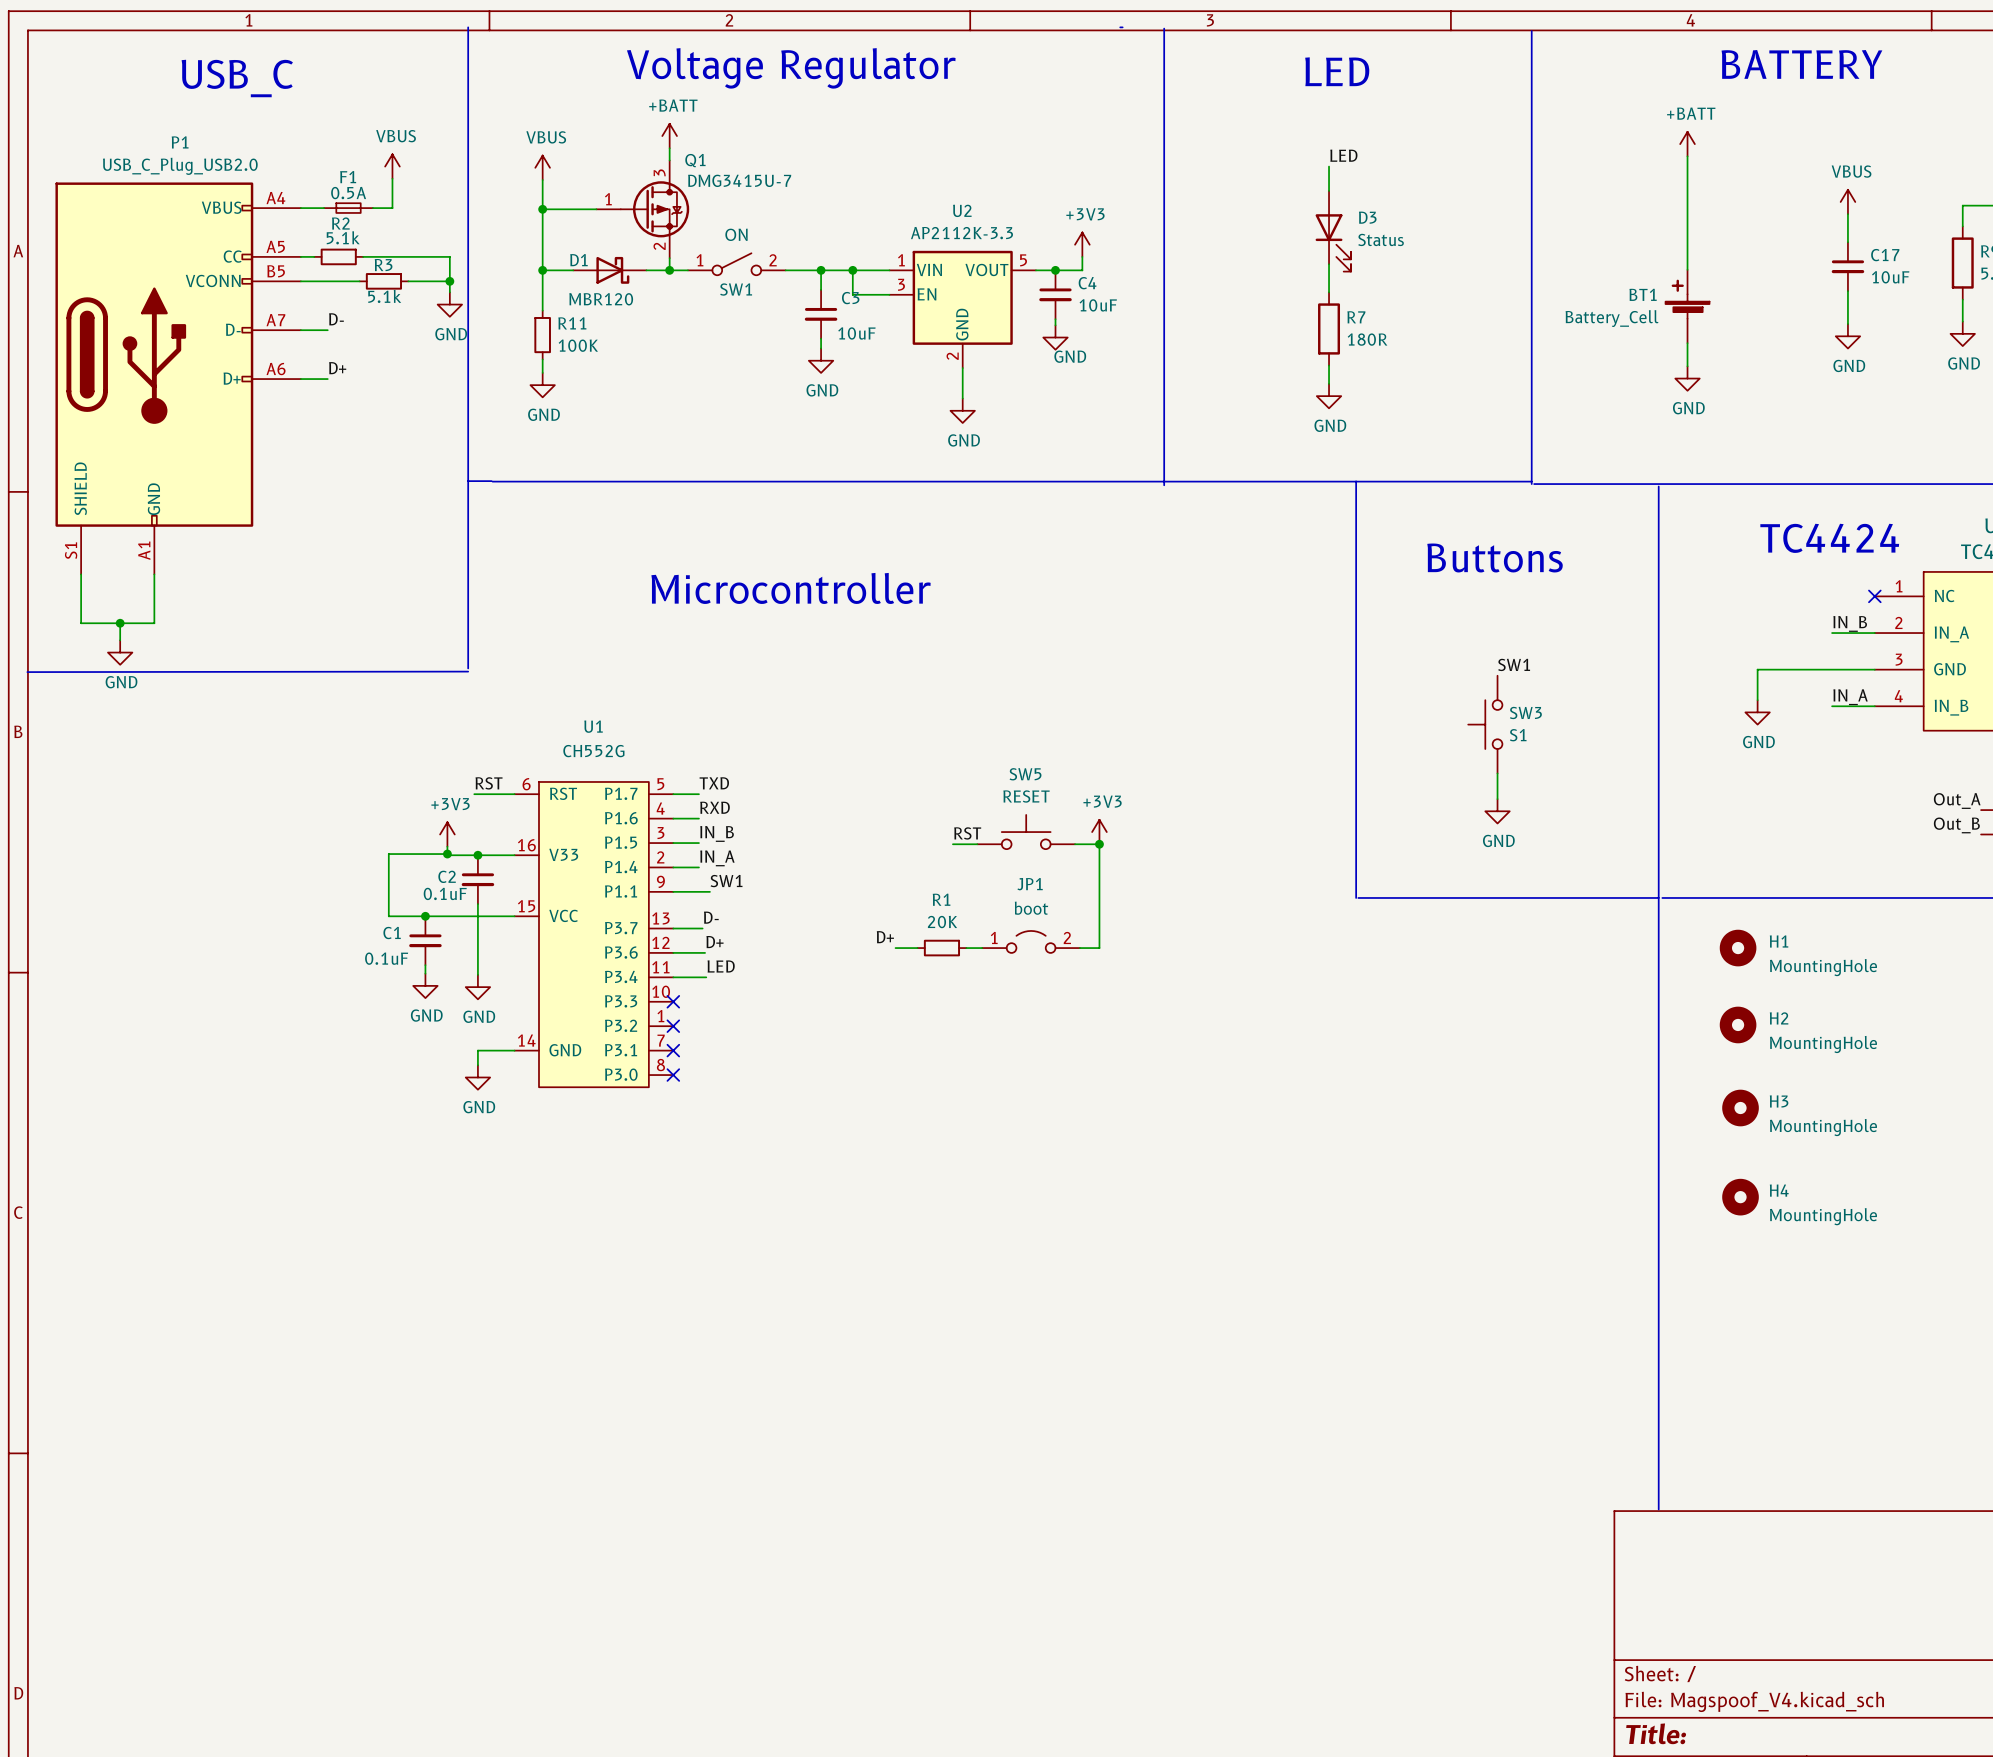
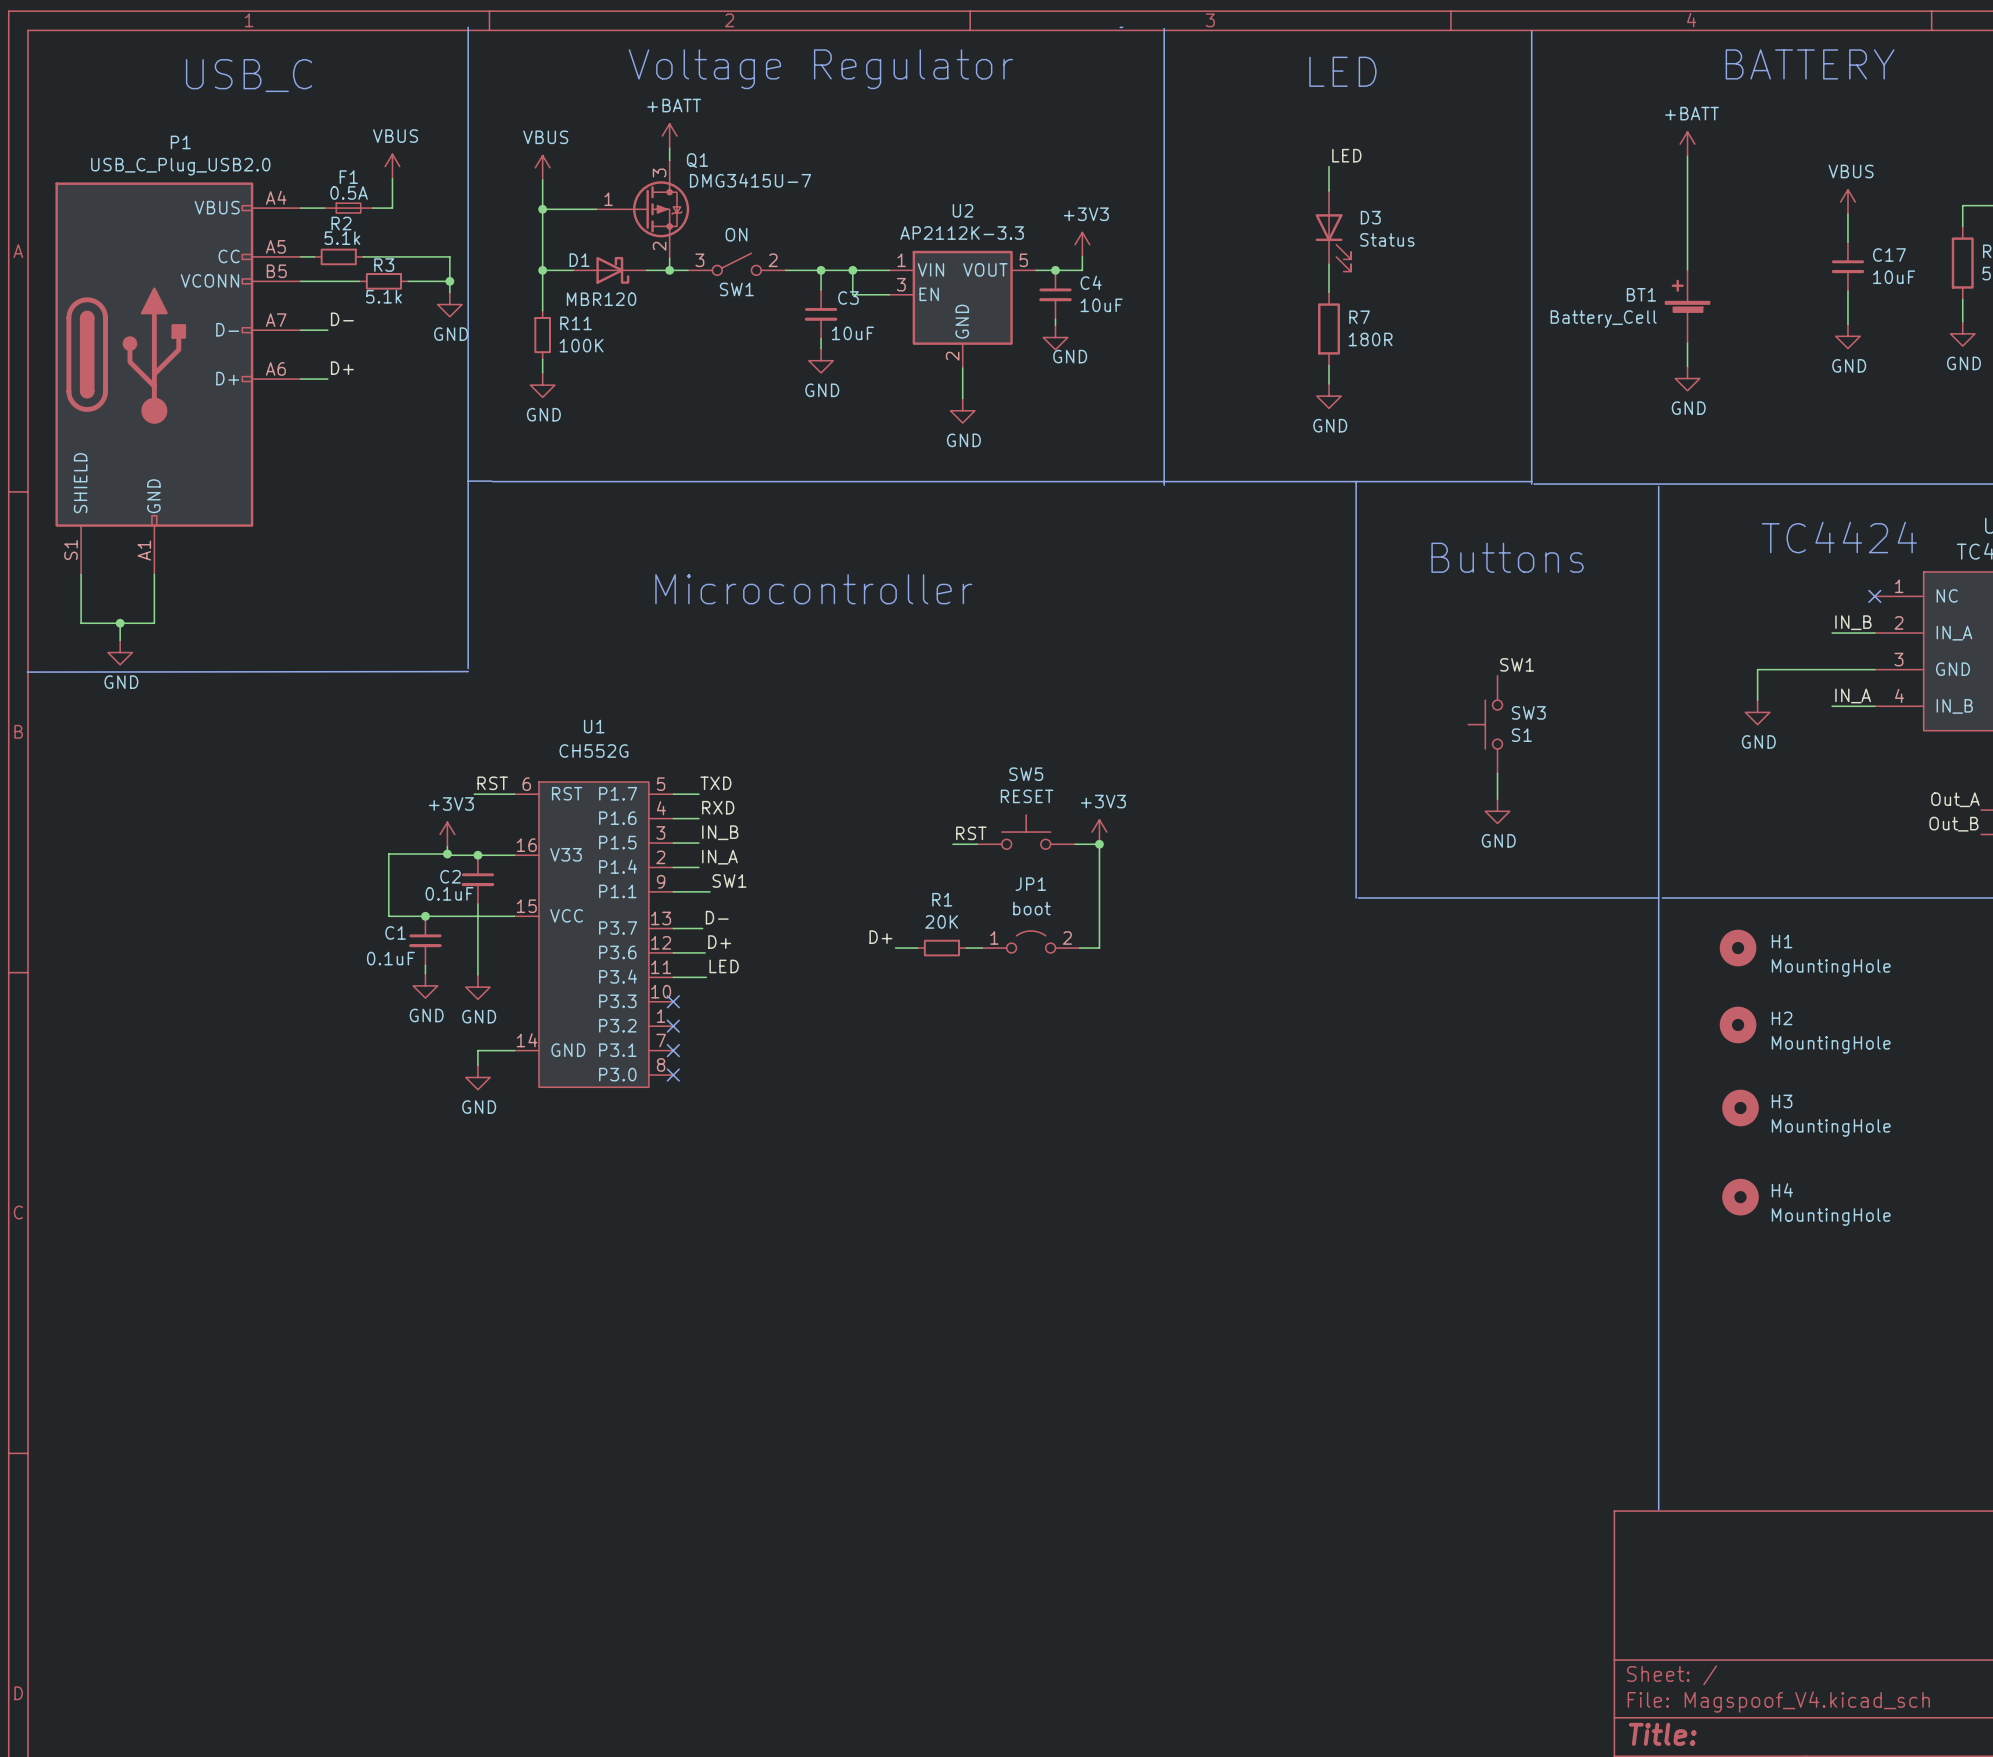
SW1 pin number: 1 (699, 260) -> 3 (699, 260)

